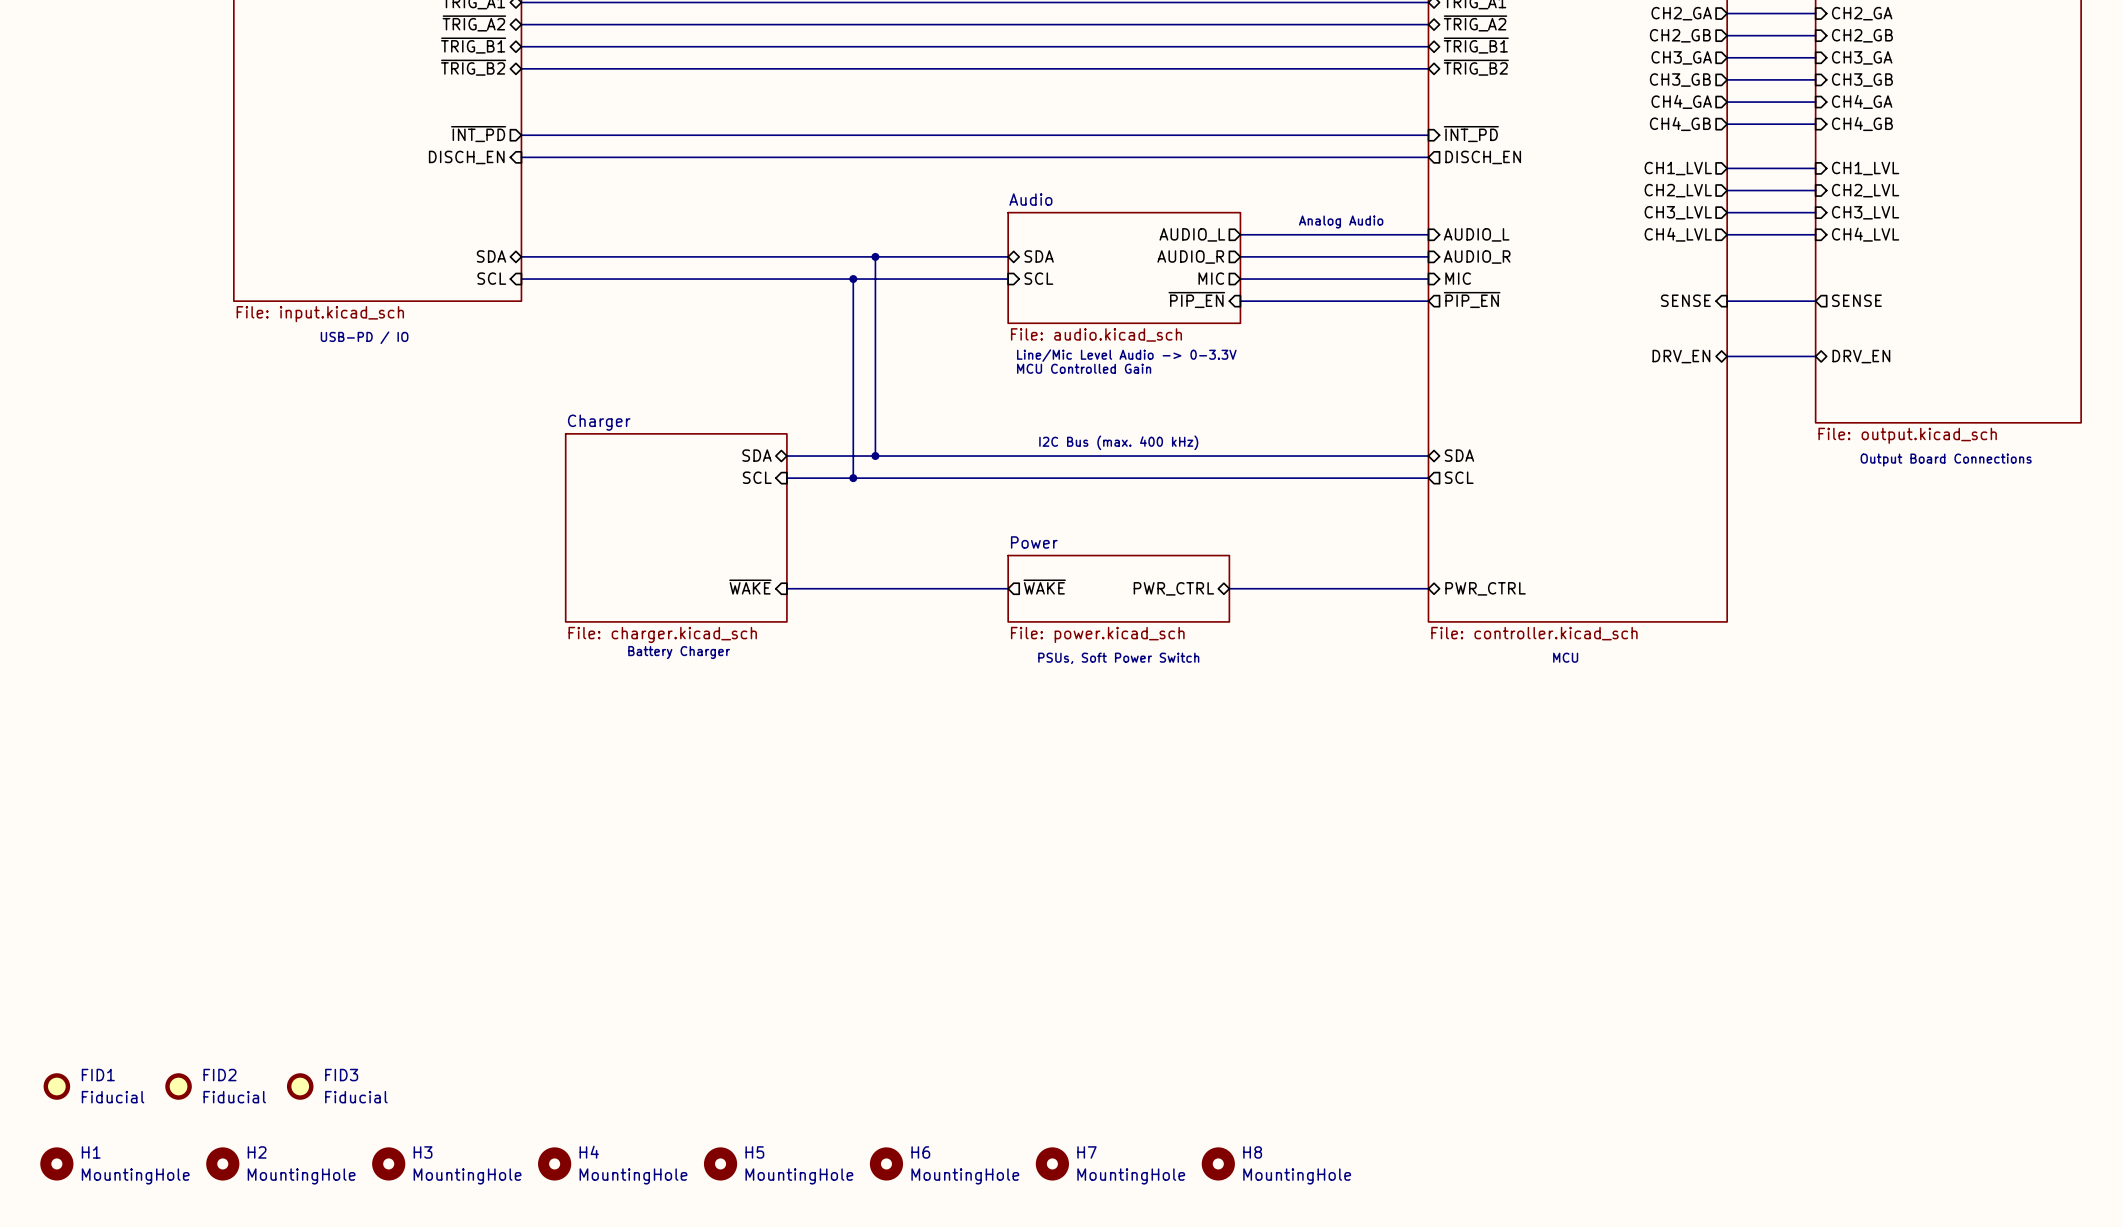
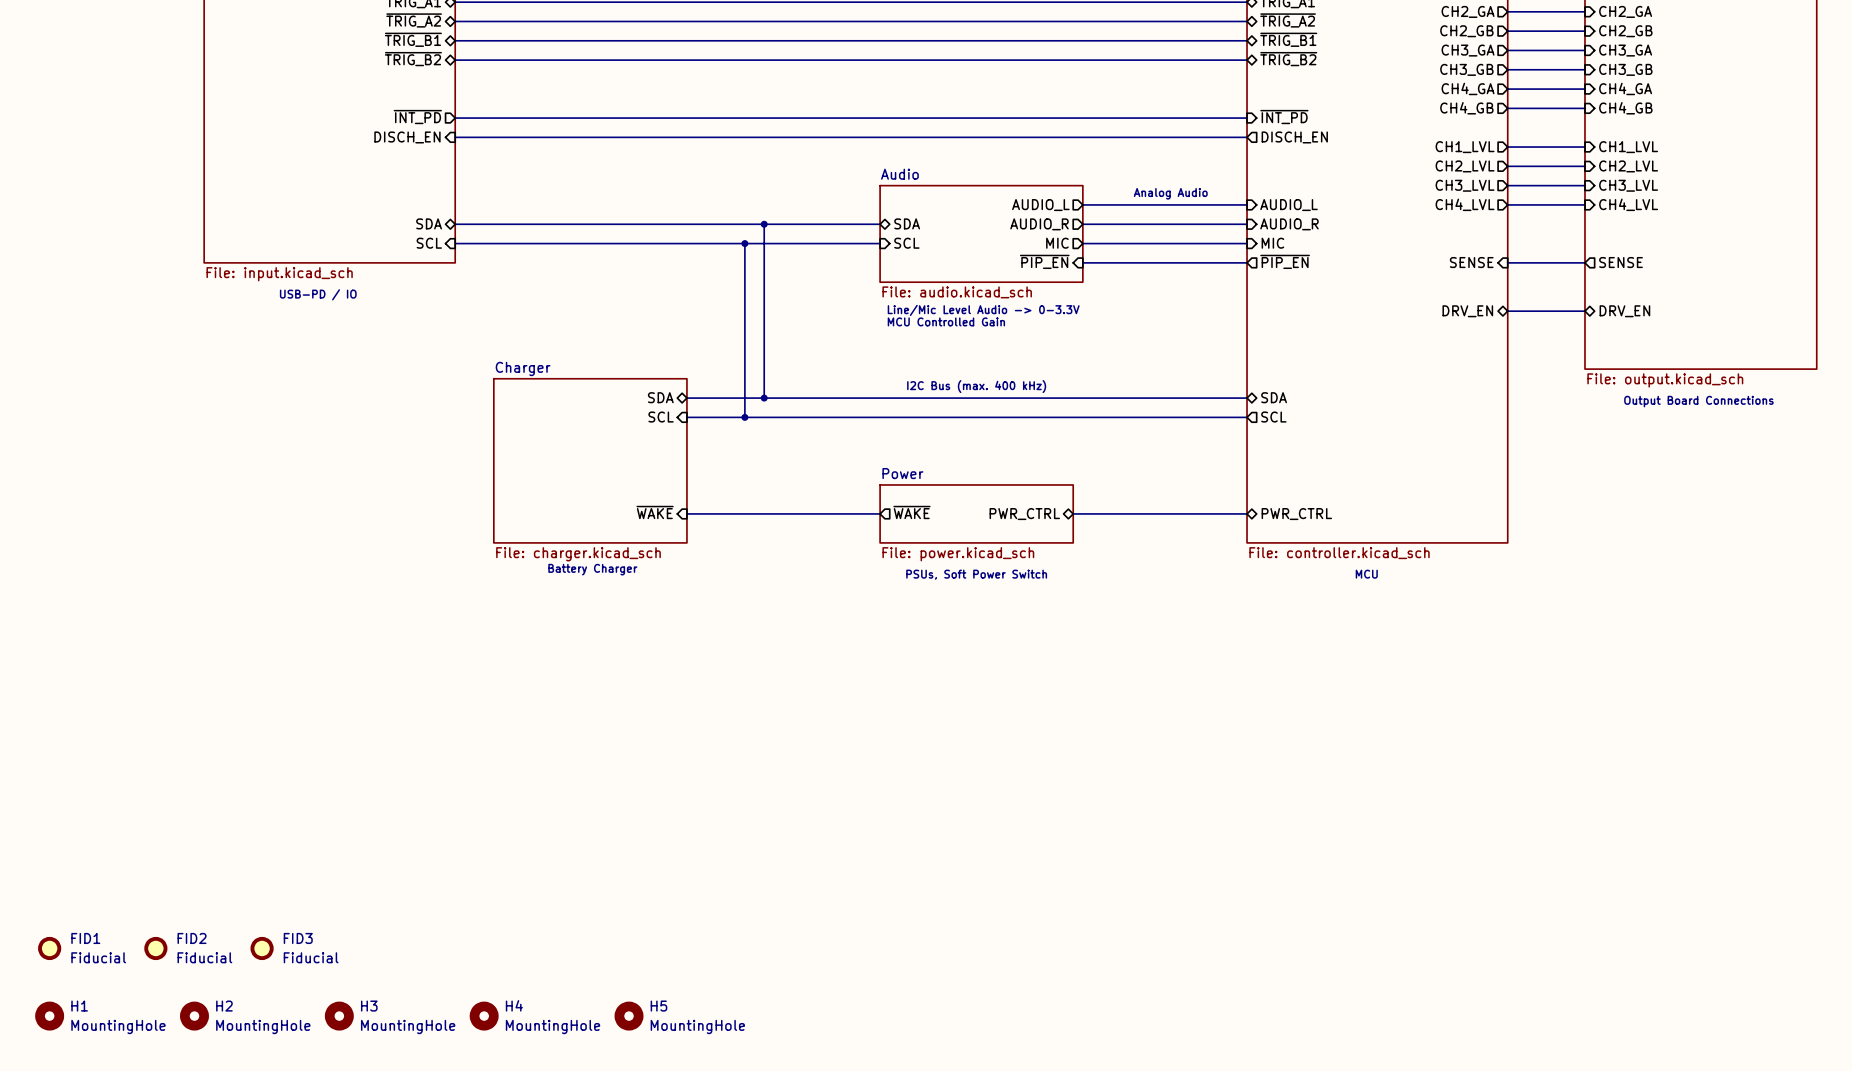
H6: MountingHole (886, 1163) -> none
H7: MountingHole (1052, 1163) -> none
H8: MountingHole (1218, 1163) -> none

